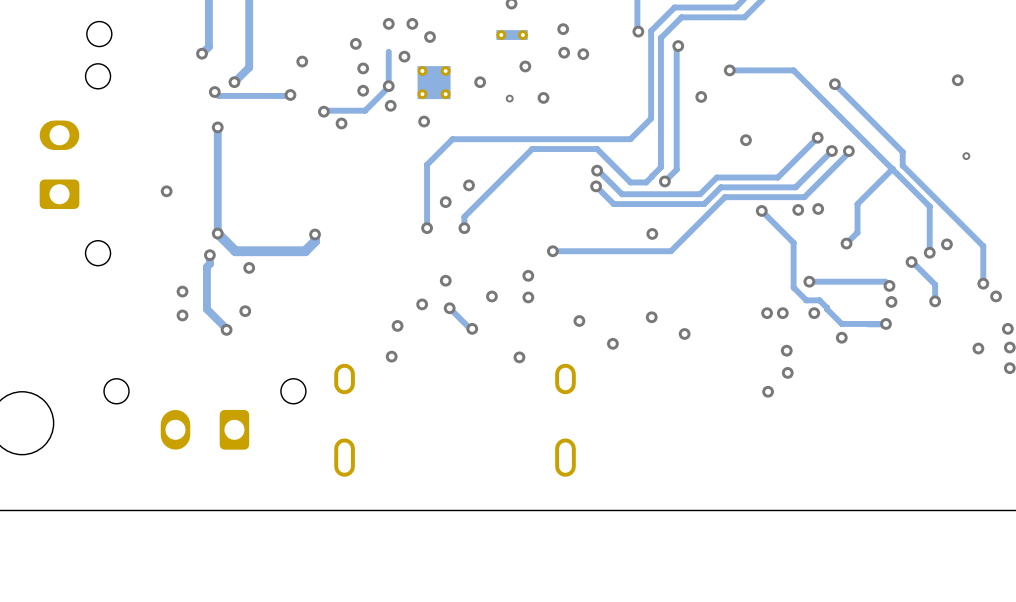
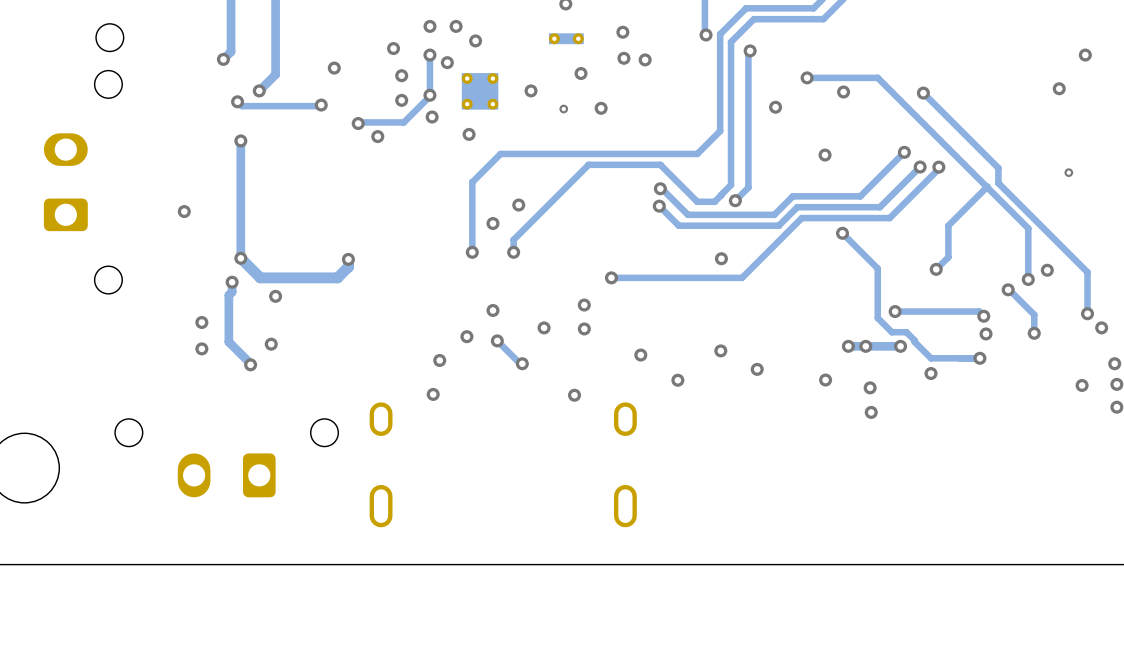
via: none -> (429, 55)
via: none -> (1085, 55)
via: none -> (843, 92)
via: (818, 208) -> none
via: (798, 209) -> none
track: none -> (900, 346) (848, 346)
via position: (768, 391) -> (825, 380)

